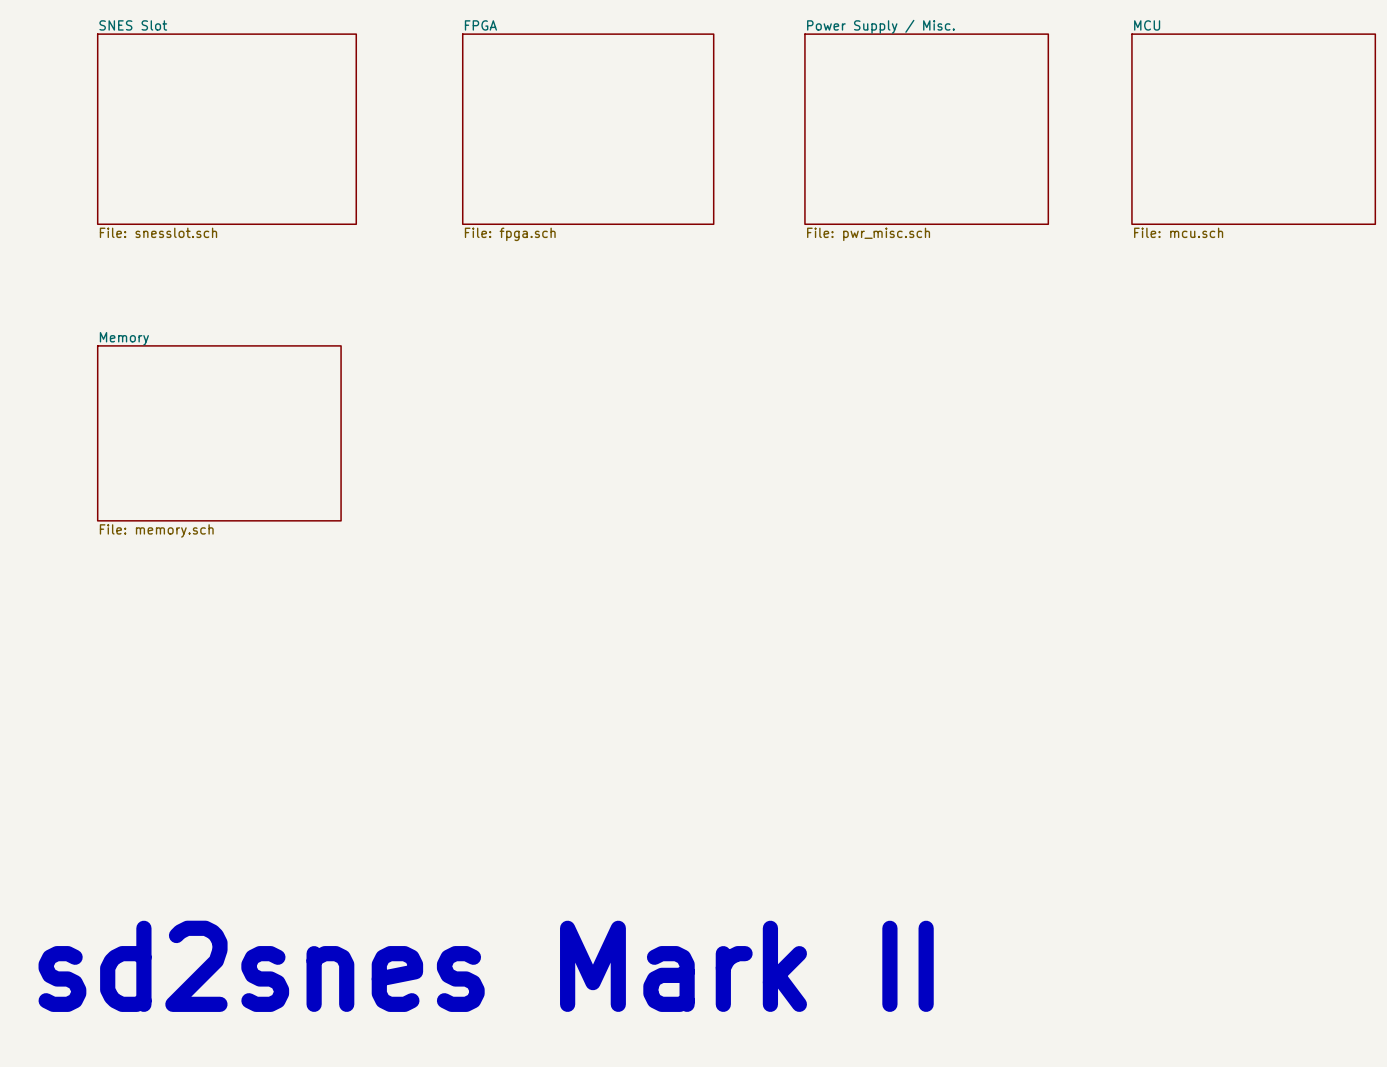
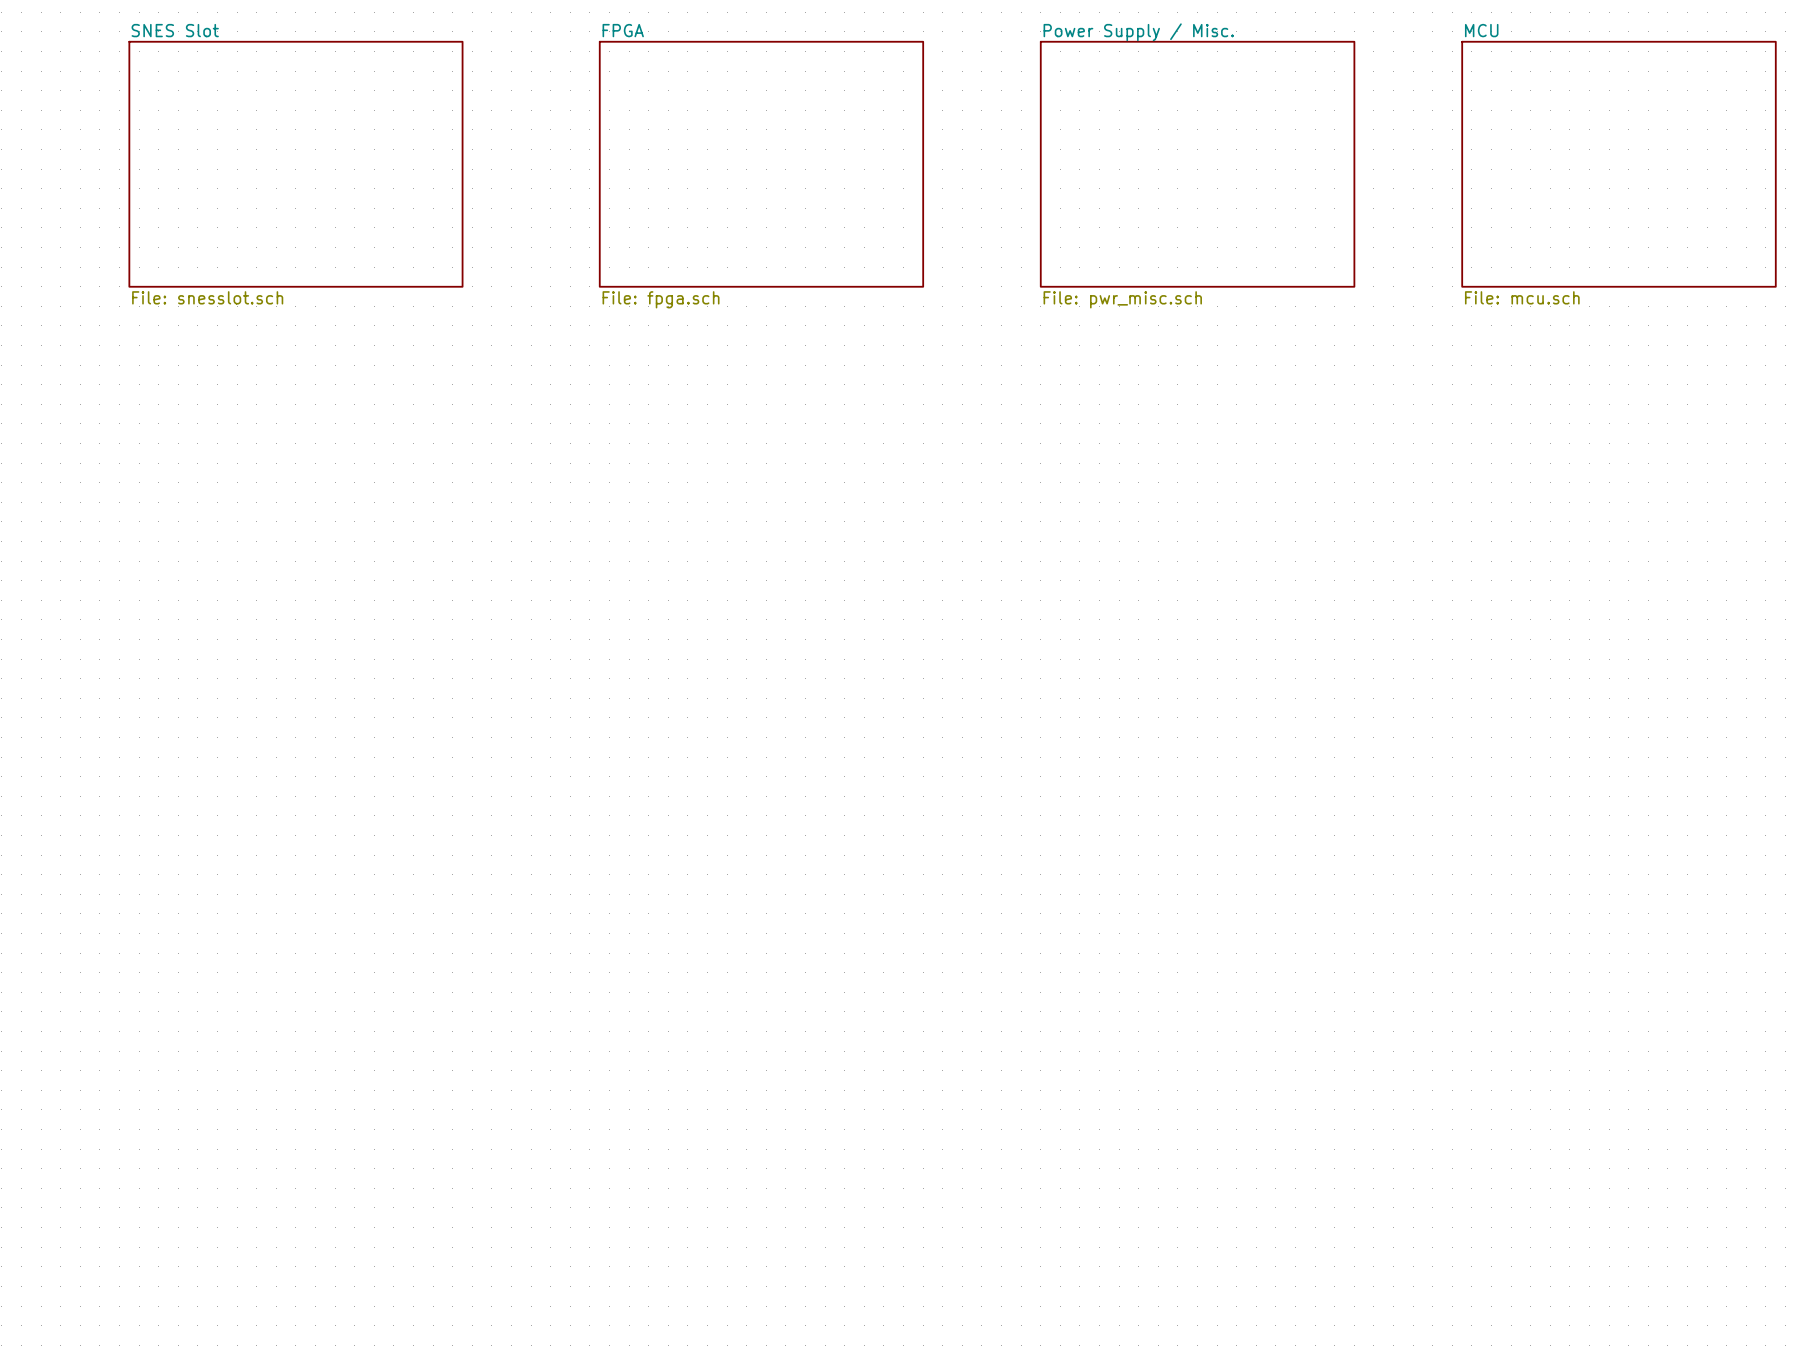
sheet Memory: File: memory.sch (219, 433) -> none
text: sd2snes Mark II (486, 966) -> none

